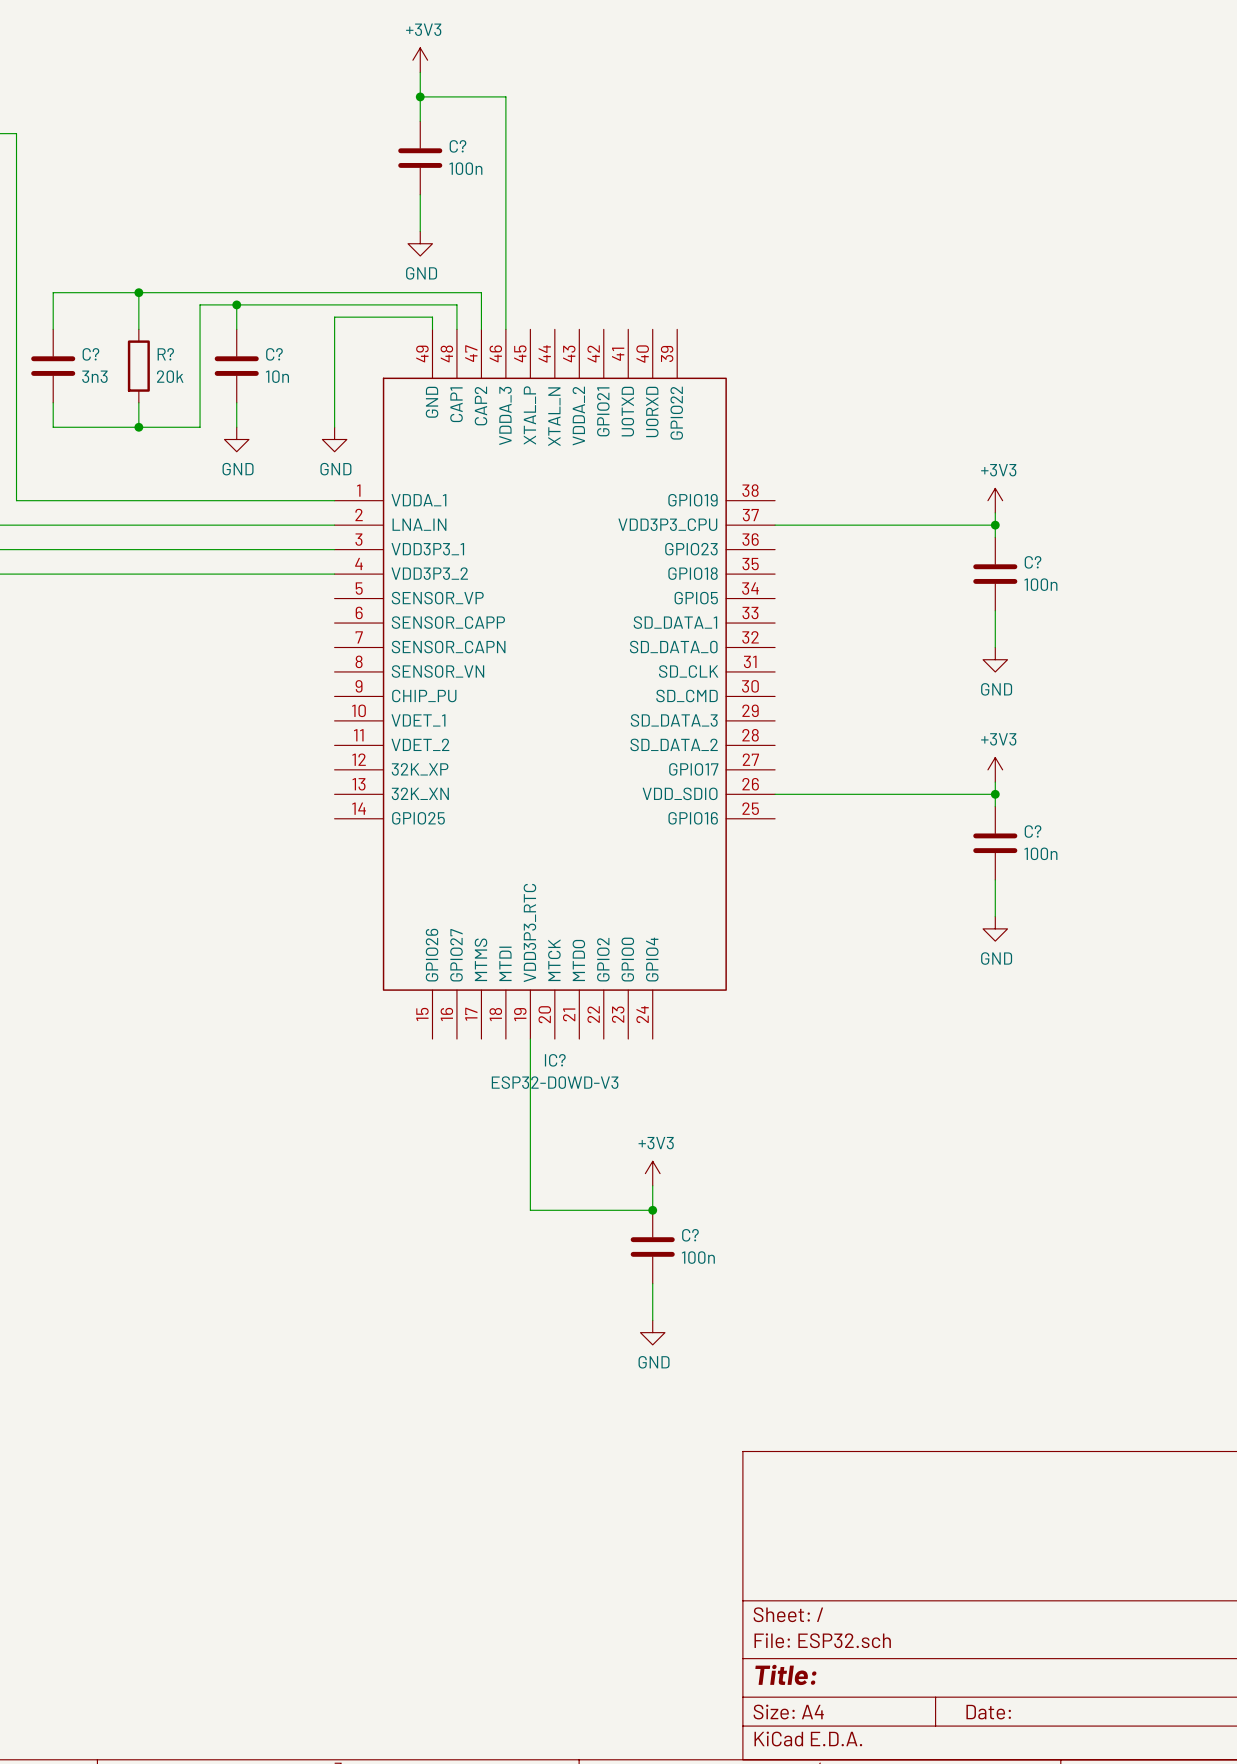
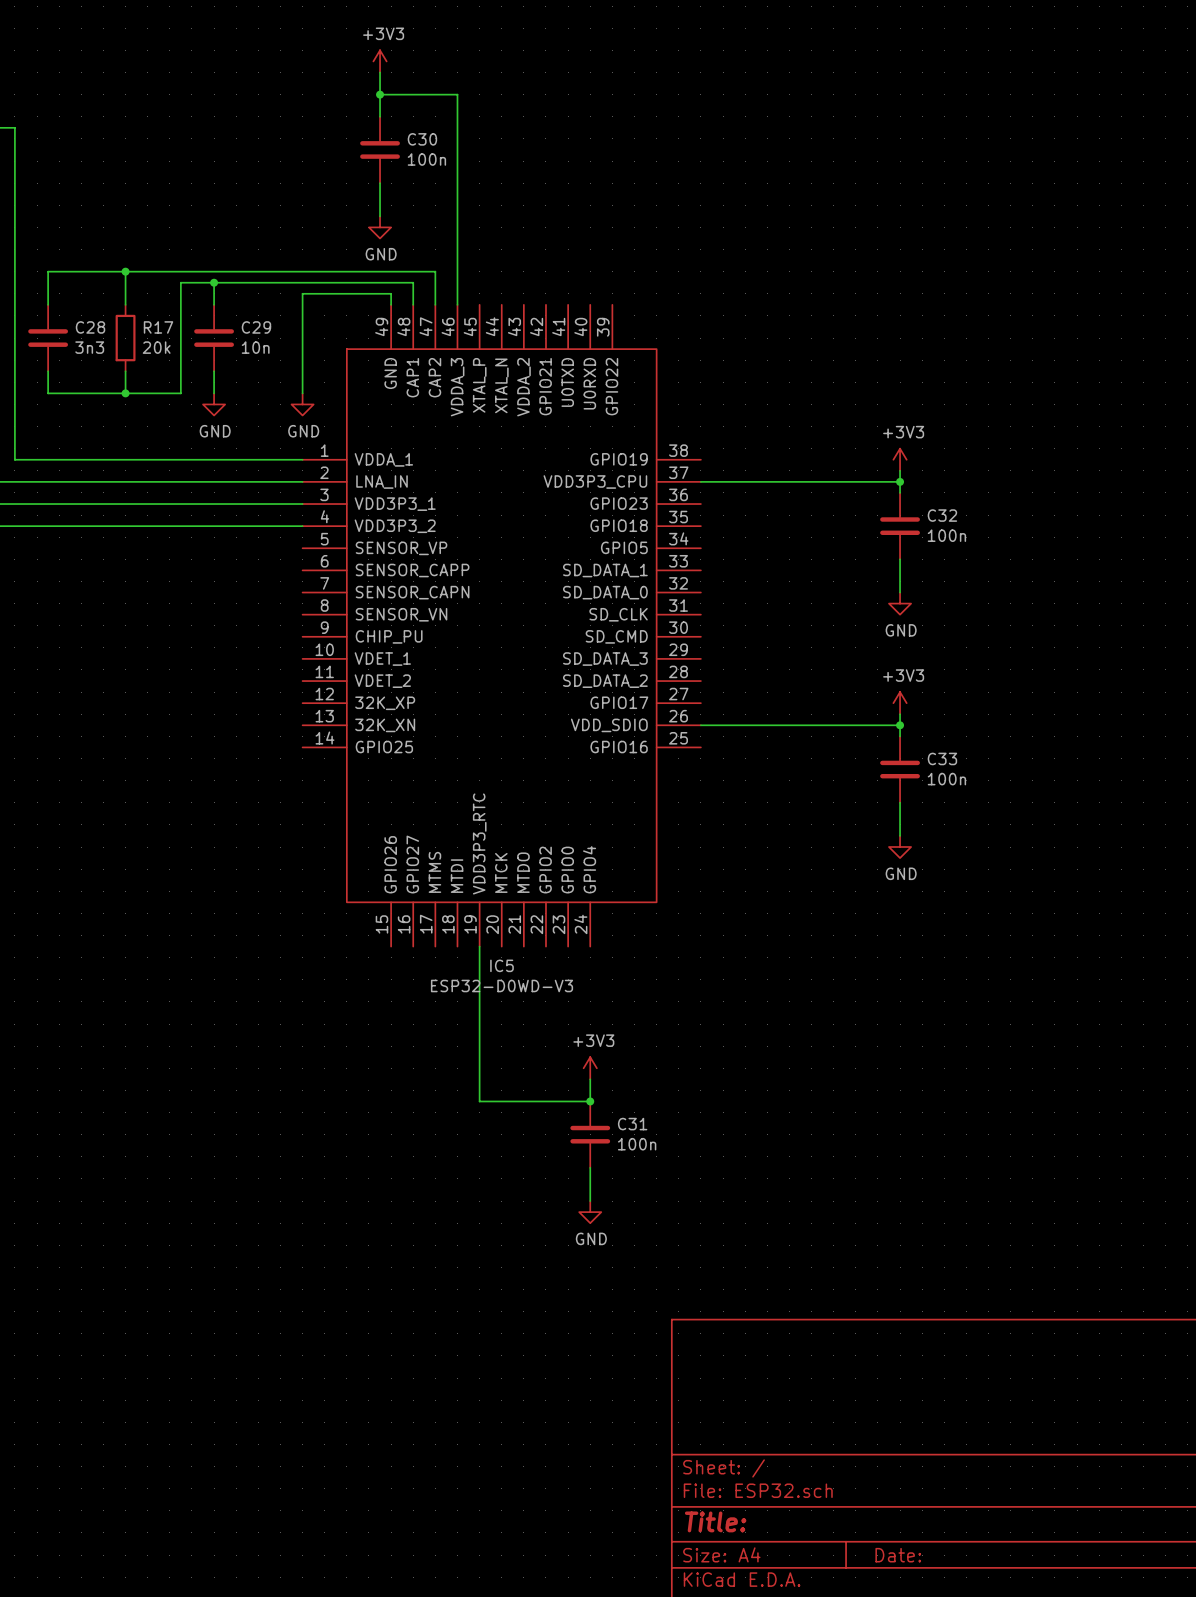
C? name: C? (457, 146) -> C30 (422, 139)
C? name: C? (90, 354) -> C28 (90, 327)
R? name: R? (165, 354) -> R17 (158, 327)
C? name: C? (274, 354) -> C29 (256, 327)
C? name: C? (1033, 562) -> C32 (942, 515)
C? name: C? (1033, 831) -> C33 (942, 758)
IC? name: IC? (555, 1060) -> IC5 (502, 965)
C? name: C? (690, 1235) -> C31 (632, 1124)

